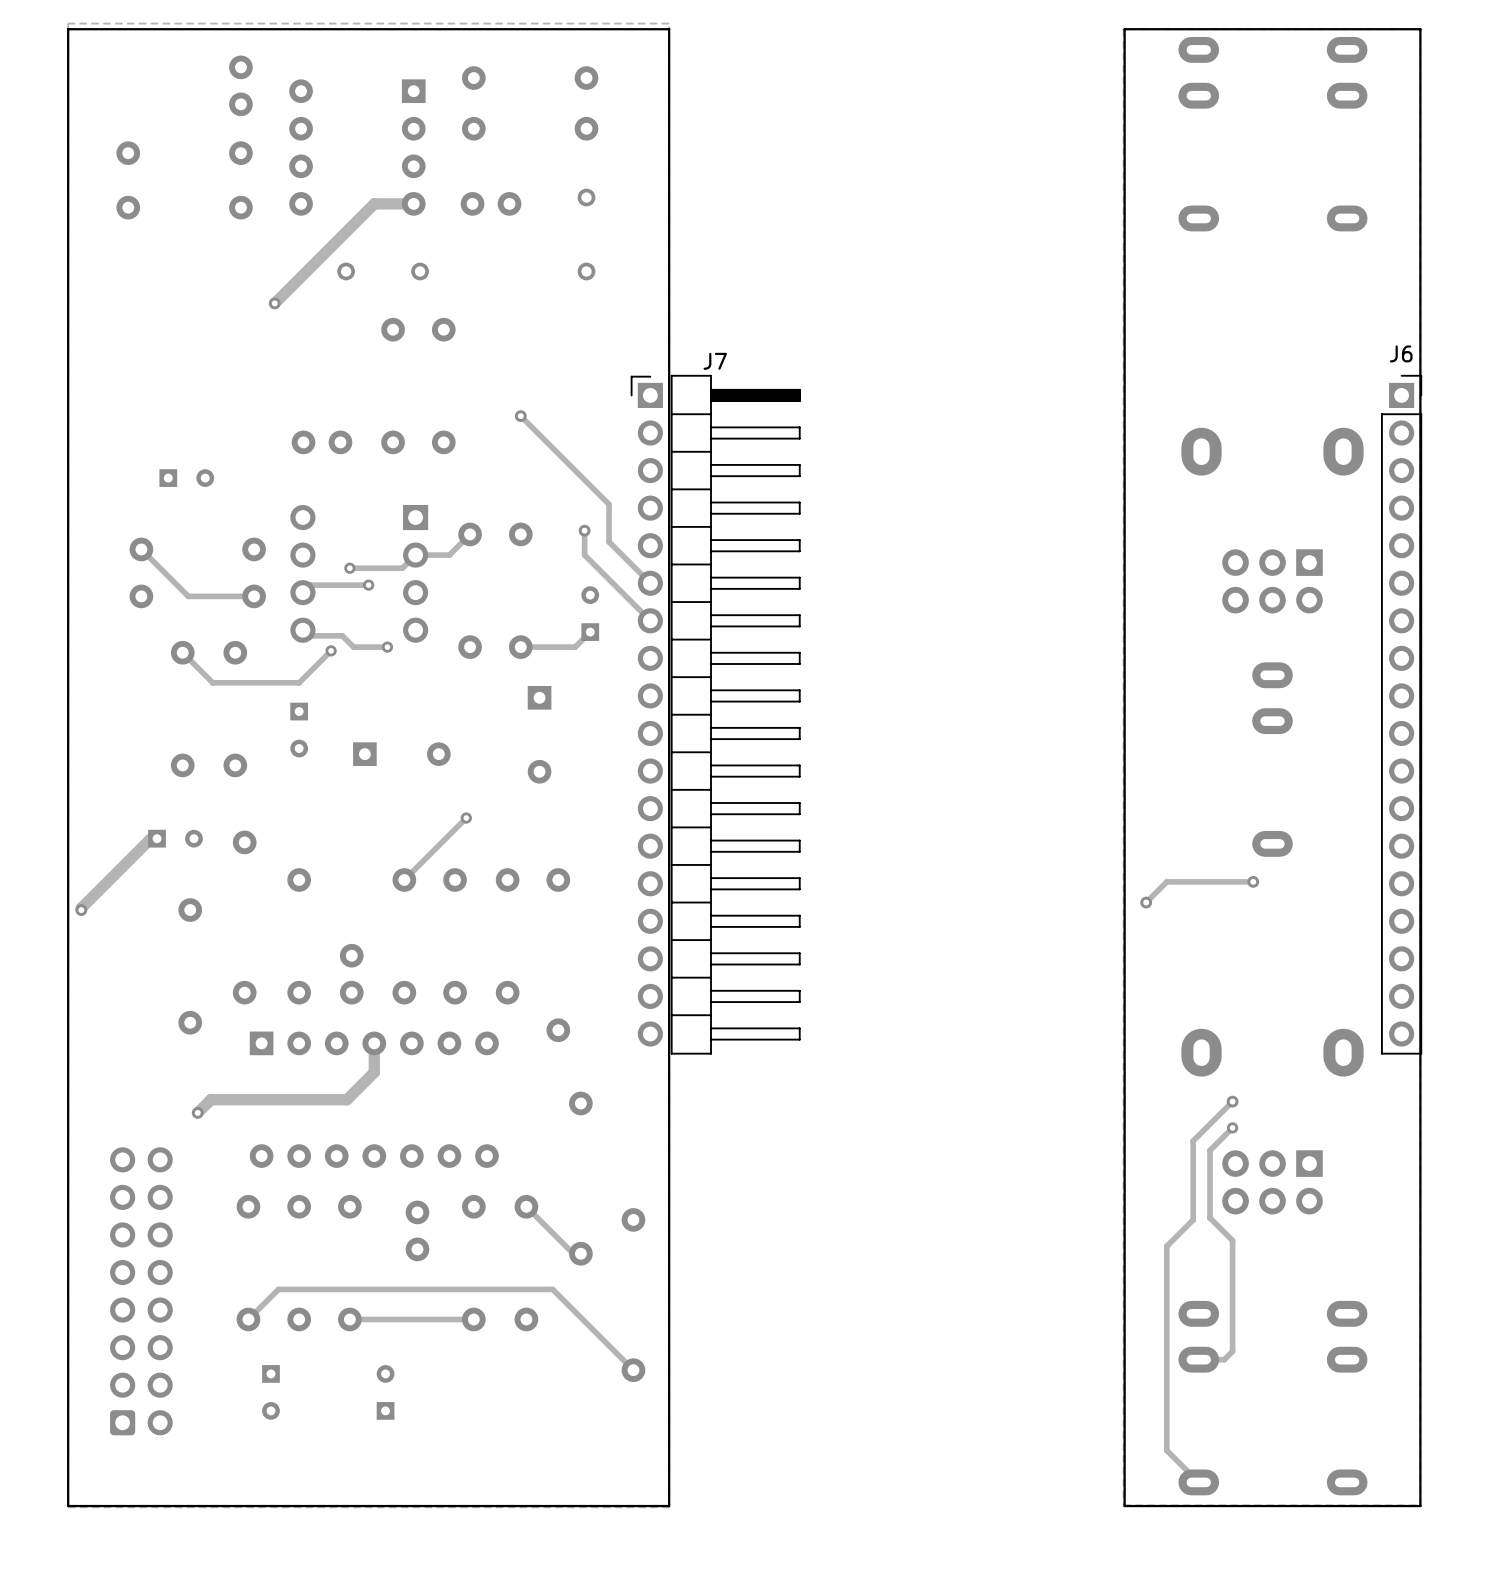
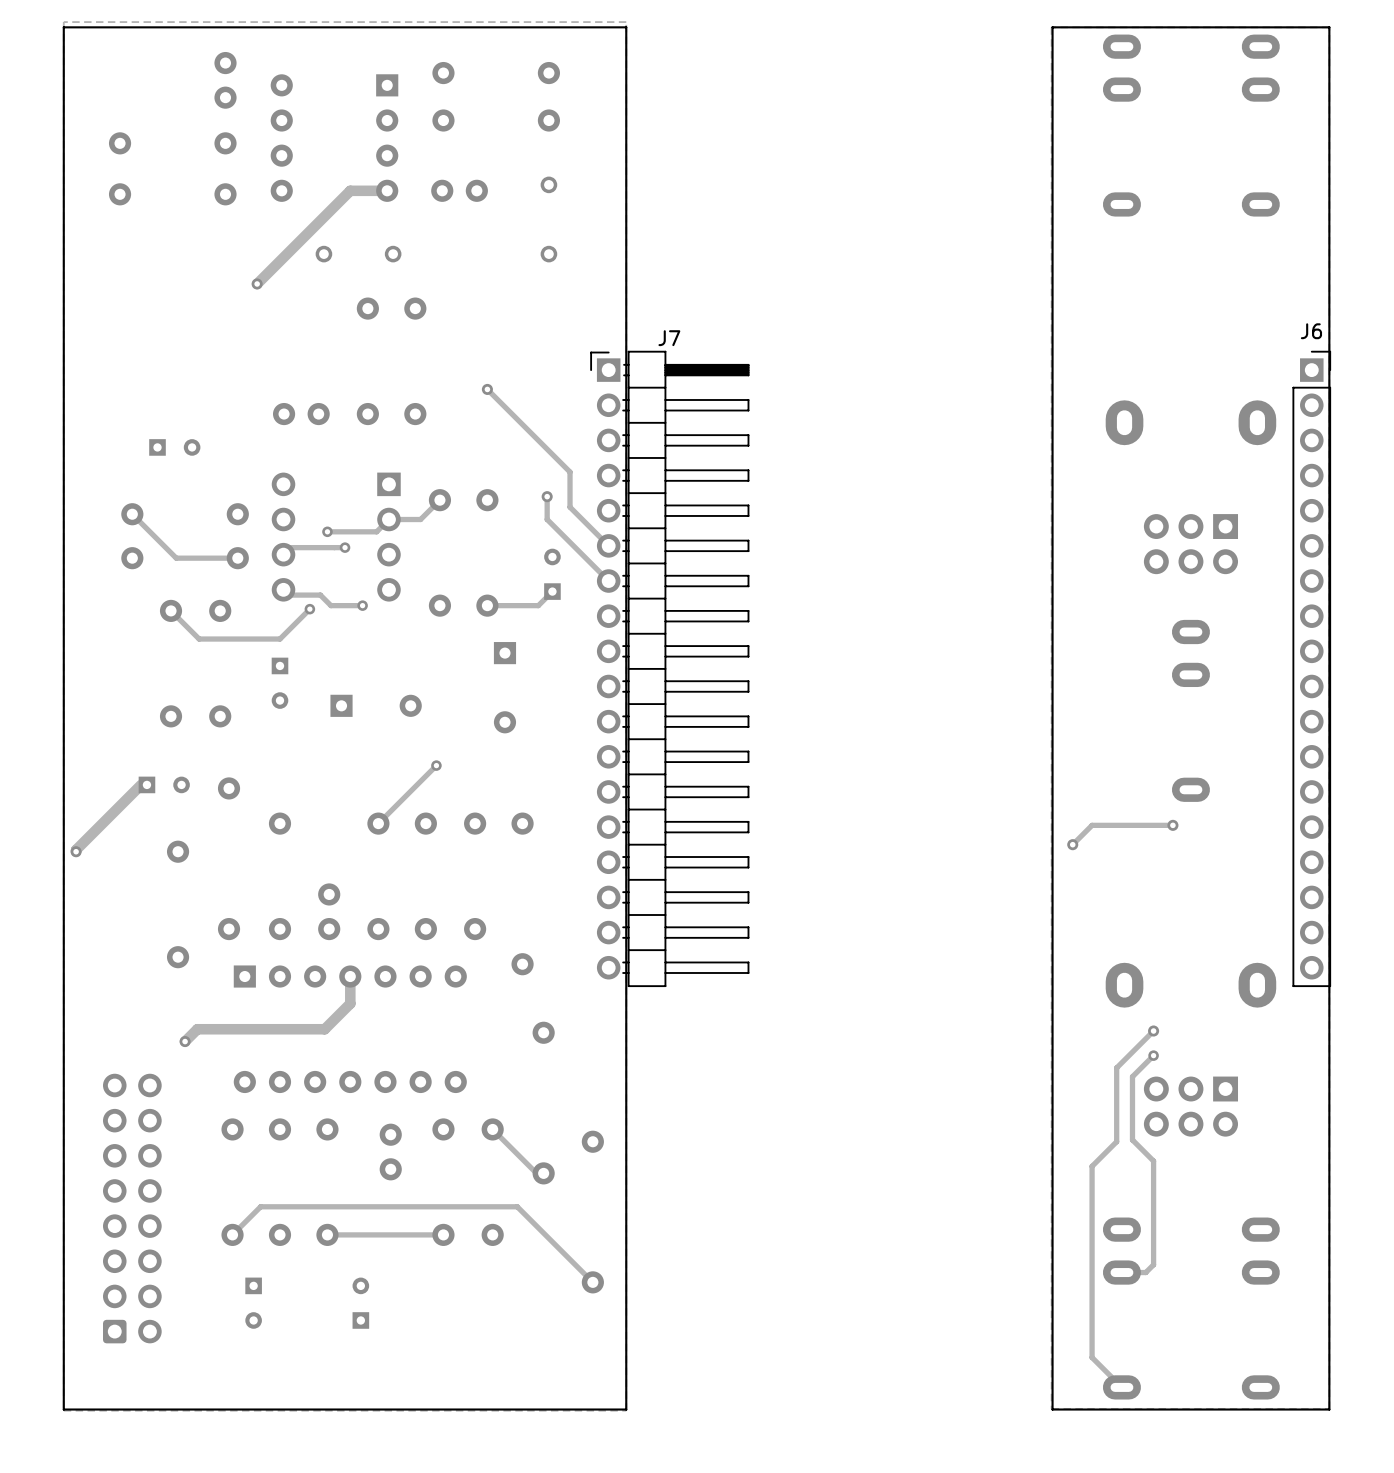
J7 footprint: [630, 374, 801, 1055] -> [590, 350, 750, 987]

